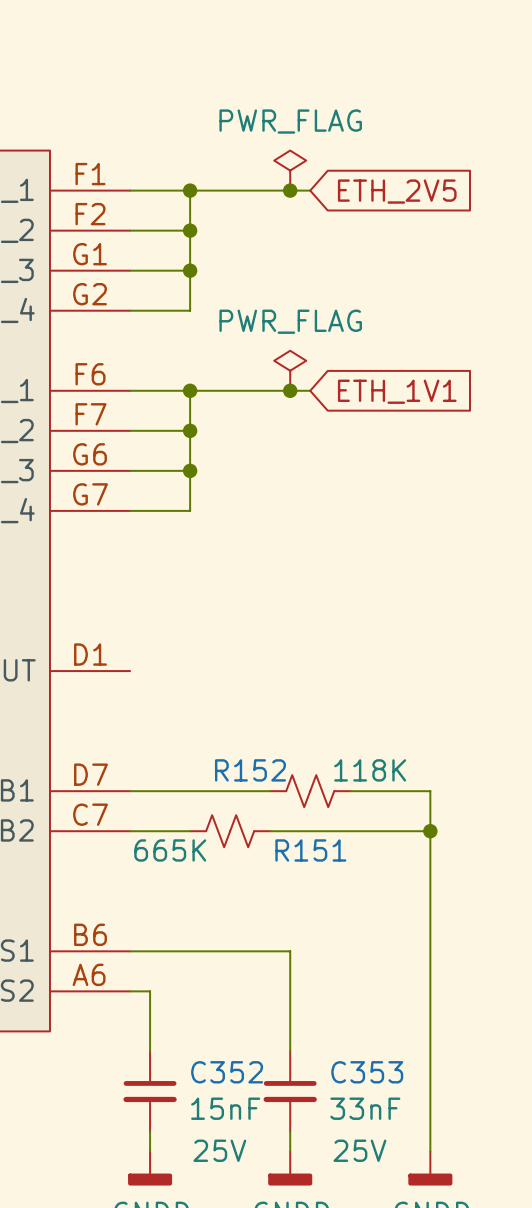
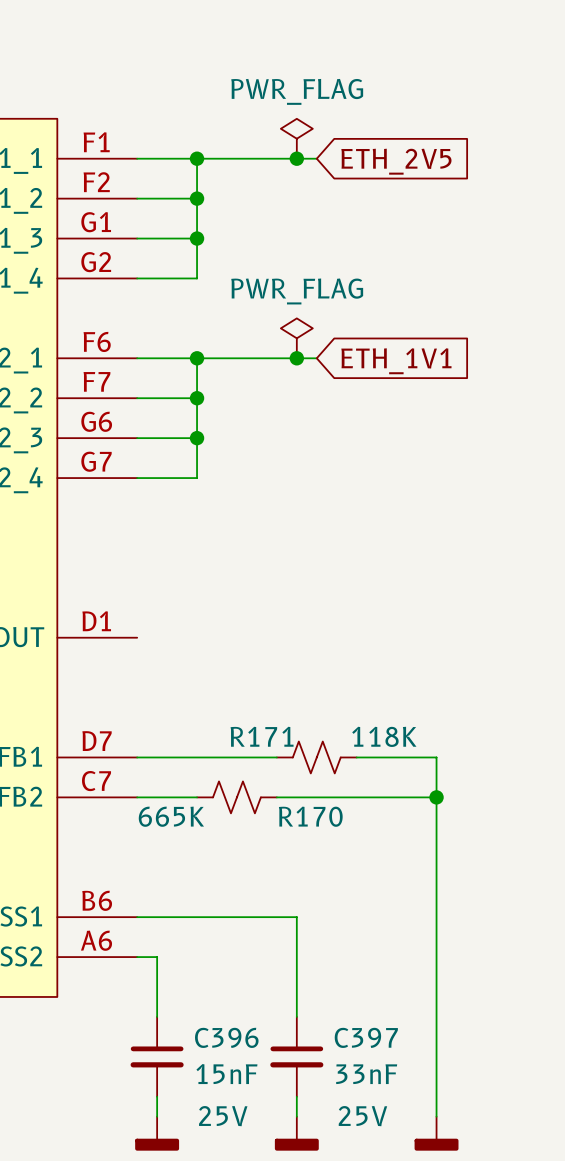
R152 name: R152 (250, 770) -> R171 (262, 736)
R151 name: R151 (310, 850) -> R170 (310, 816)
C352 name: C352 (227, 1072) -> C396 (226, 1037)
C353 name: C353 (367, 1072) -> C397 (366, 1037)

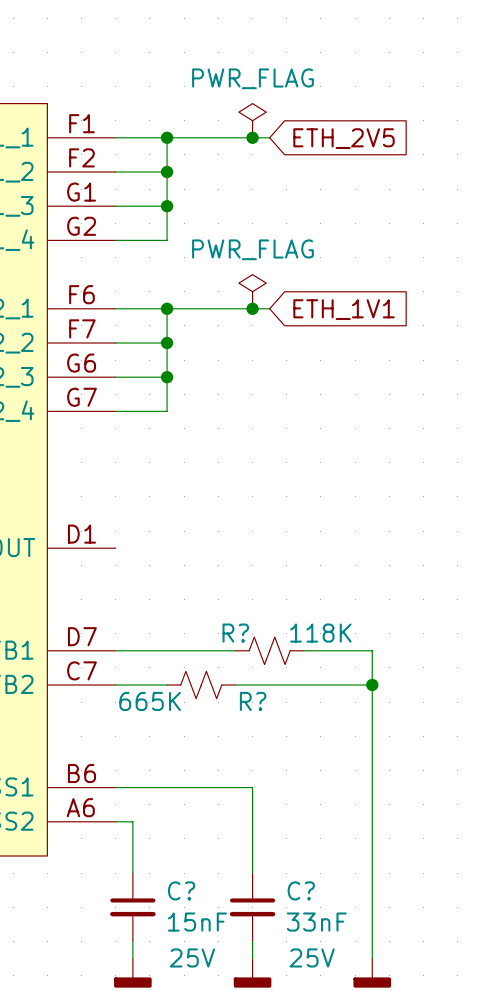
R171 name: R171 (262, 736) -> R? (235, 633)
R170 name: R170 (310, 816) -> R? (253, 701)
C396 name: C396 (226, 1037) -> C? (181, 890)
C397 name: C397 (366, 1037) -> C? (301, 890)

